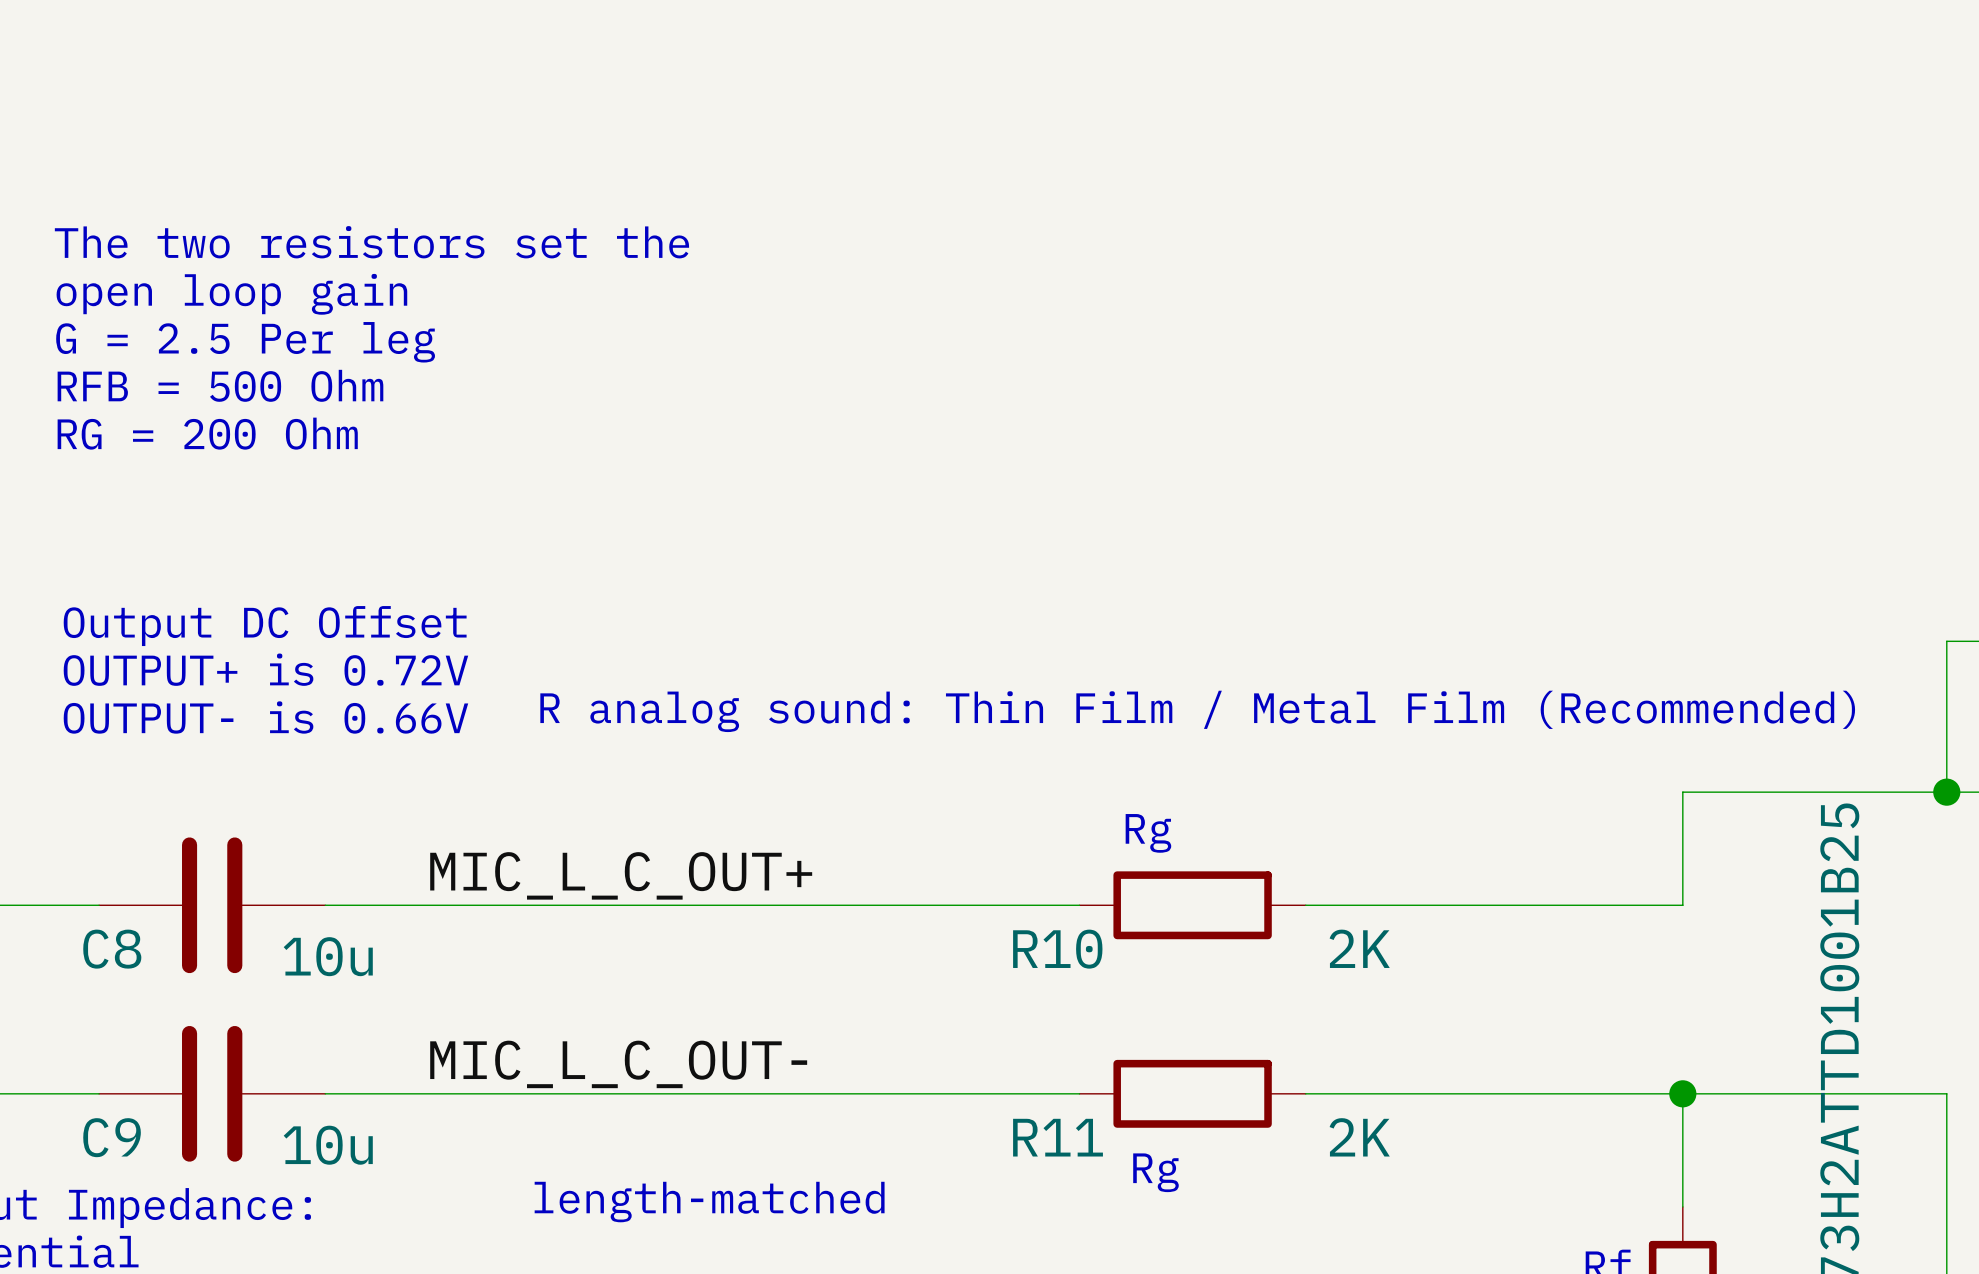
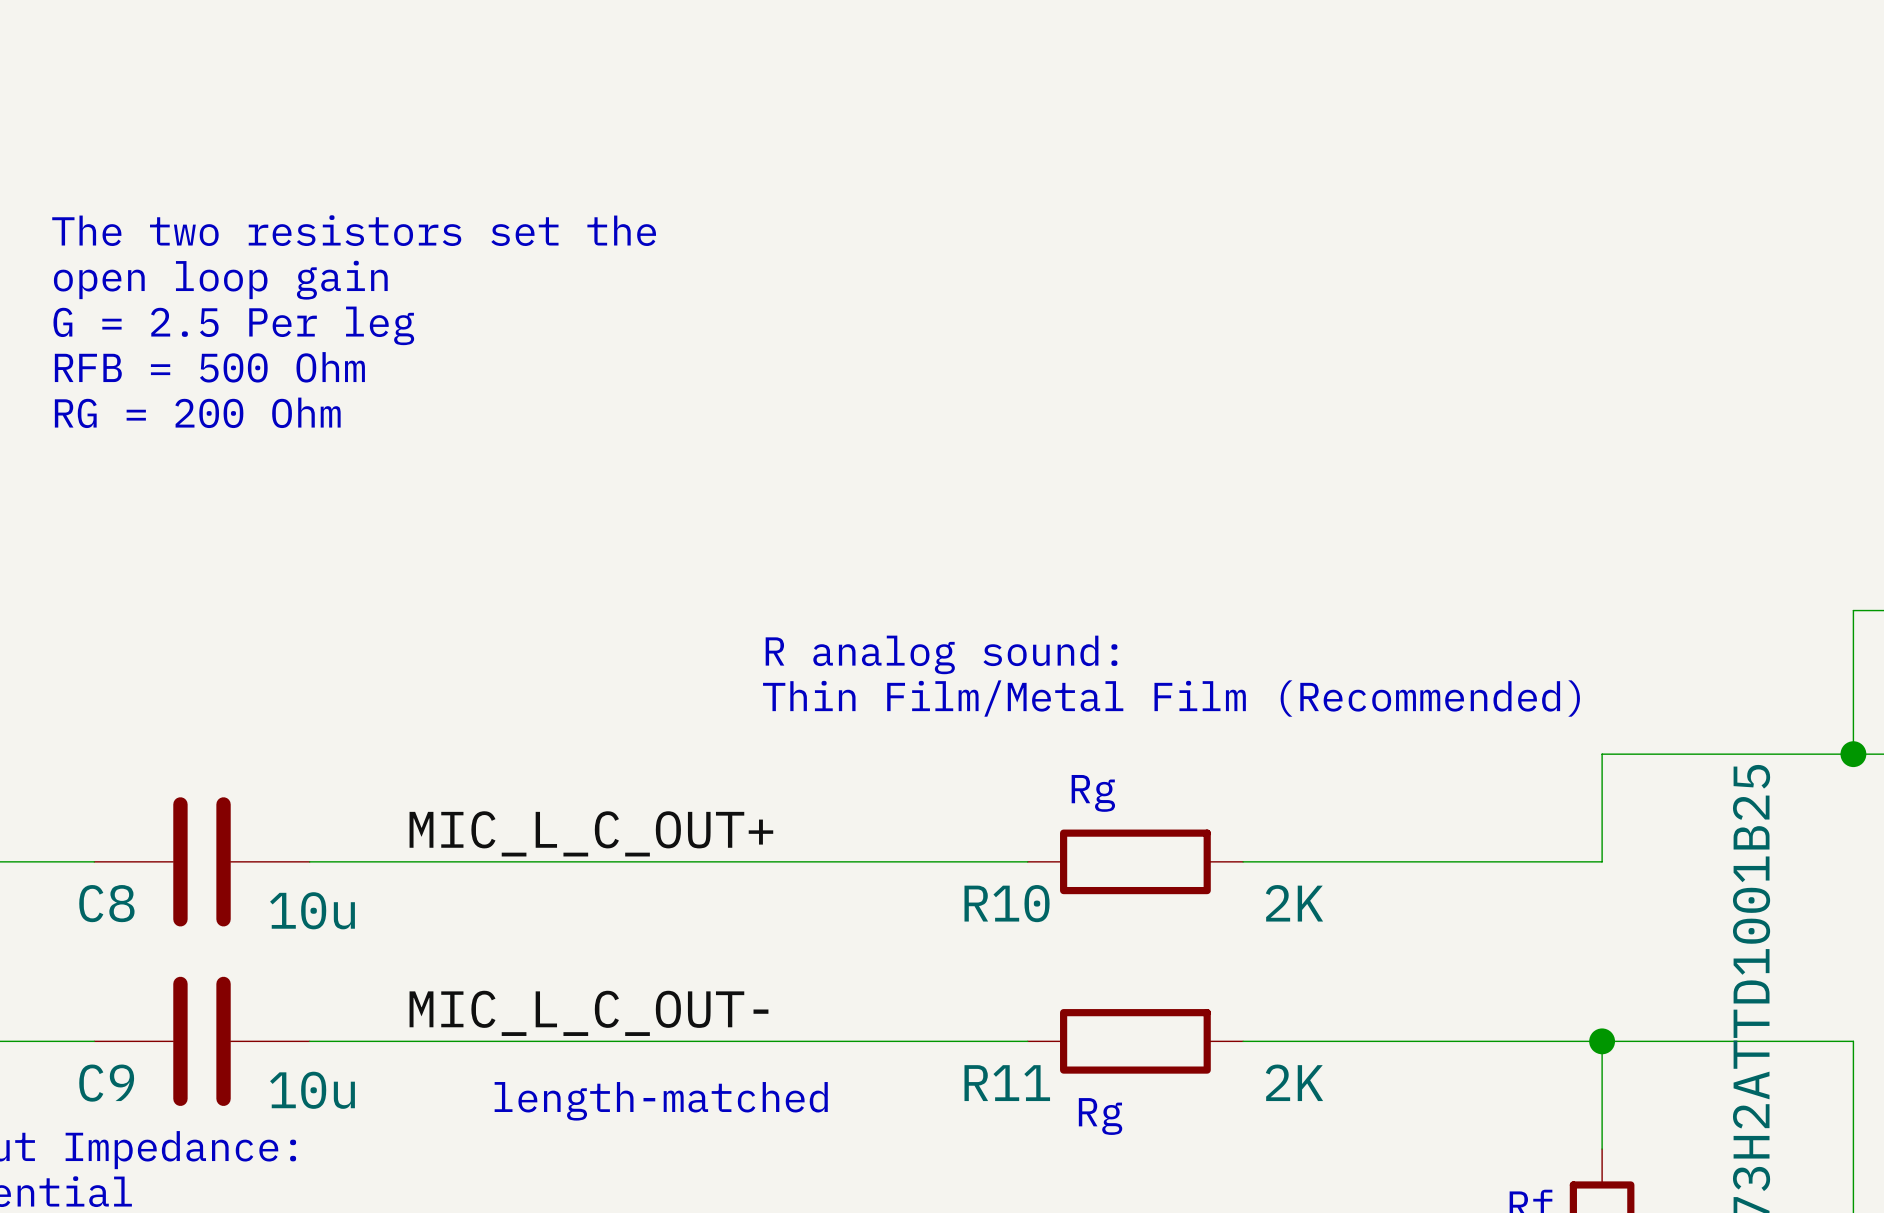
text: Output DC Offset (265, 626) -> none
text: OUTPUT+ is 0.72V (265, 669) -> none
text: none -> R analog sound: (941, 654)
text: R analog sound: Thin Film / Metal Film (Recommended) (1197, 711) -> Thin Film/Metal Film (Recommended) (1171, 698)
text: OUTPUT- is 0.66V (265, 717) -> none
text position: length-matched (709, 1202) -> length-matched (661, 1101)

